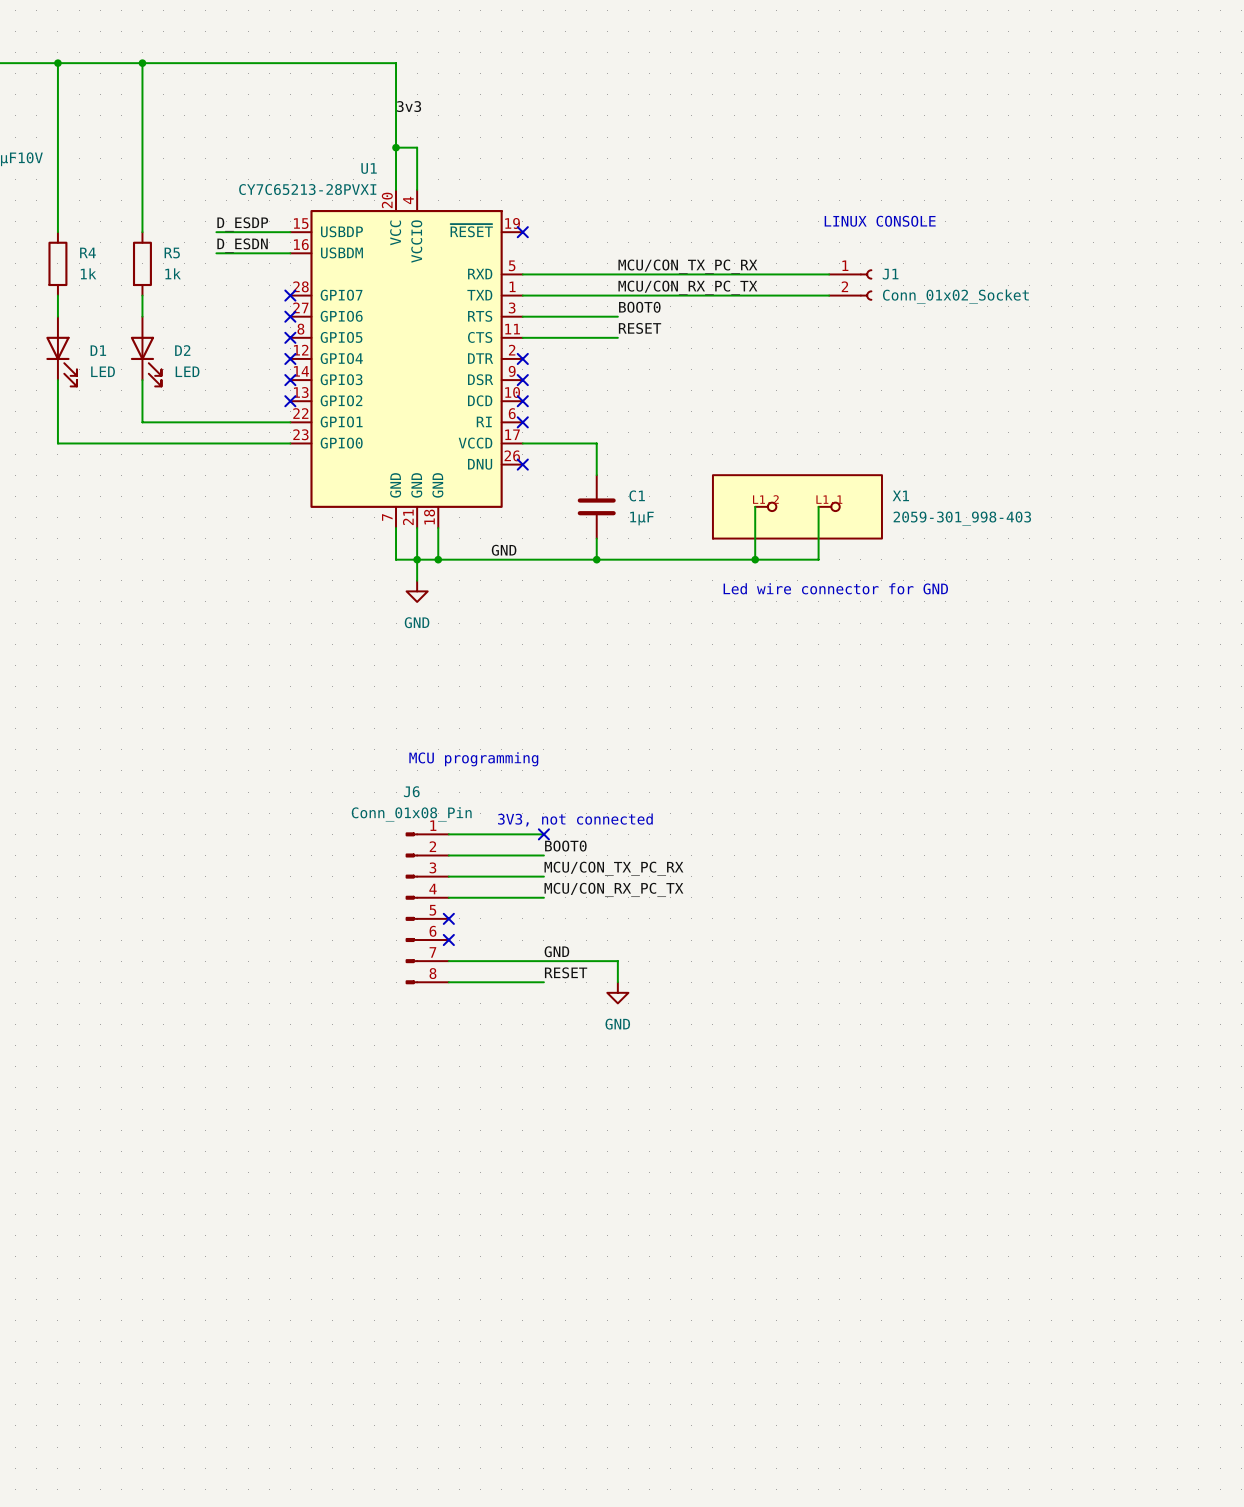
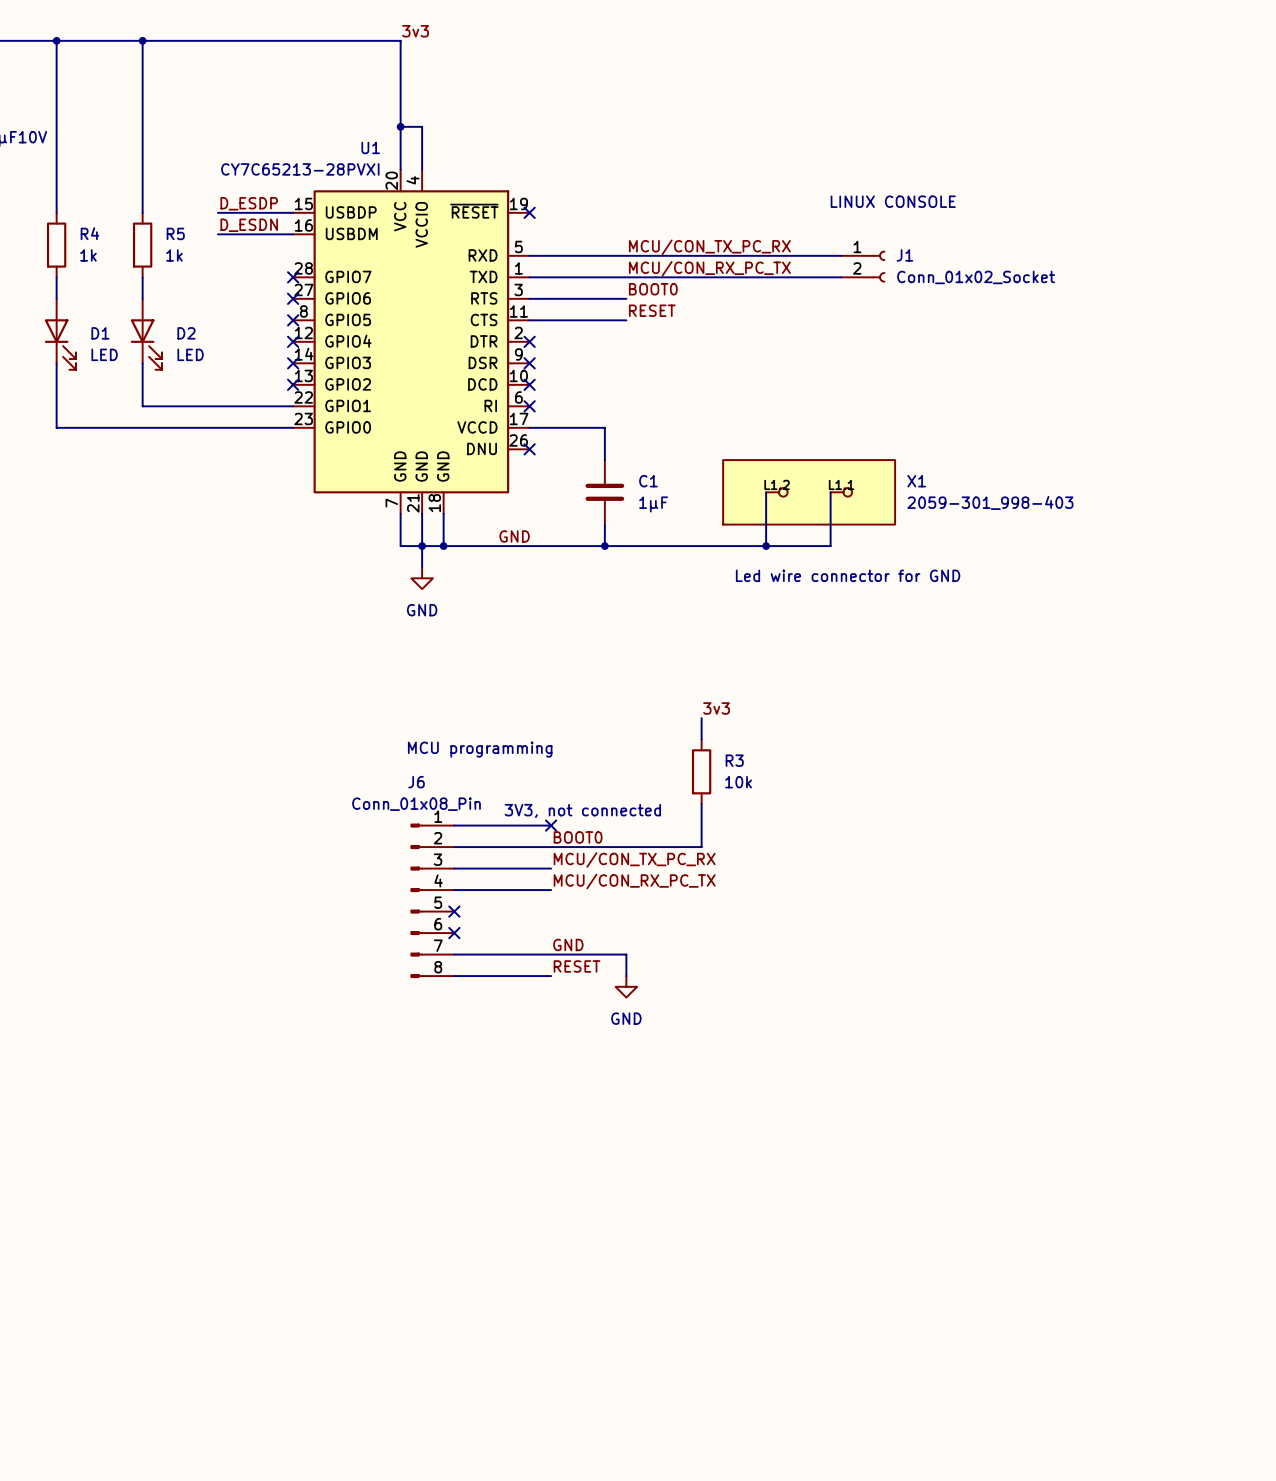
label position: 3v3 (409, 106) -> 3v3 (415, 31)
label: none -> 3v3 (716, 708)
wire: none -> (701, 718) (701, 739)
R3: none -> 10k (701, 771)
wire: none -> (701, 804) (701, 847) (551, 847)

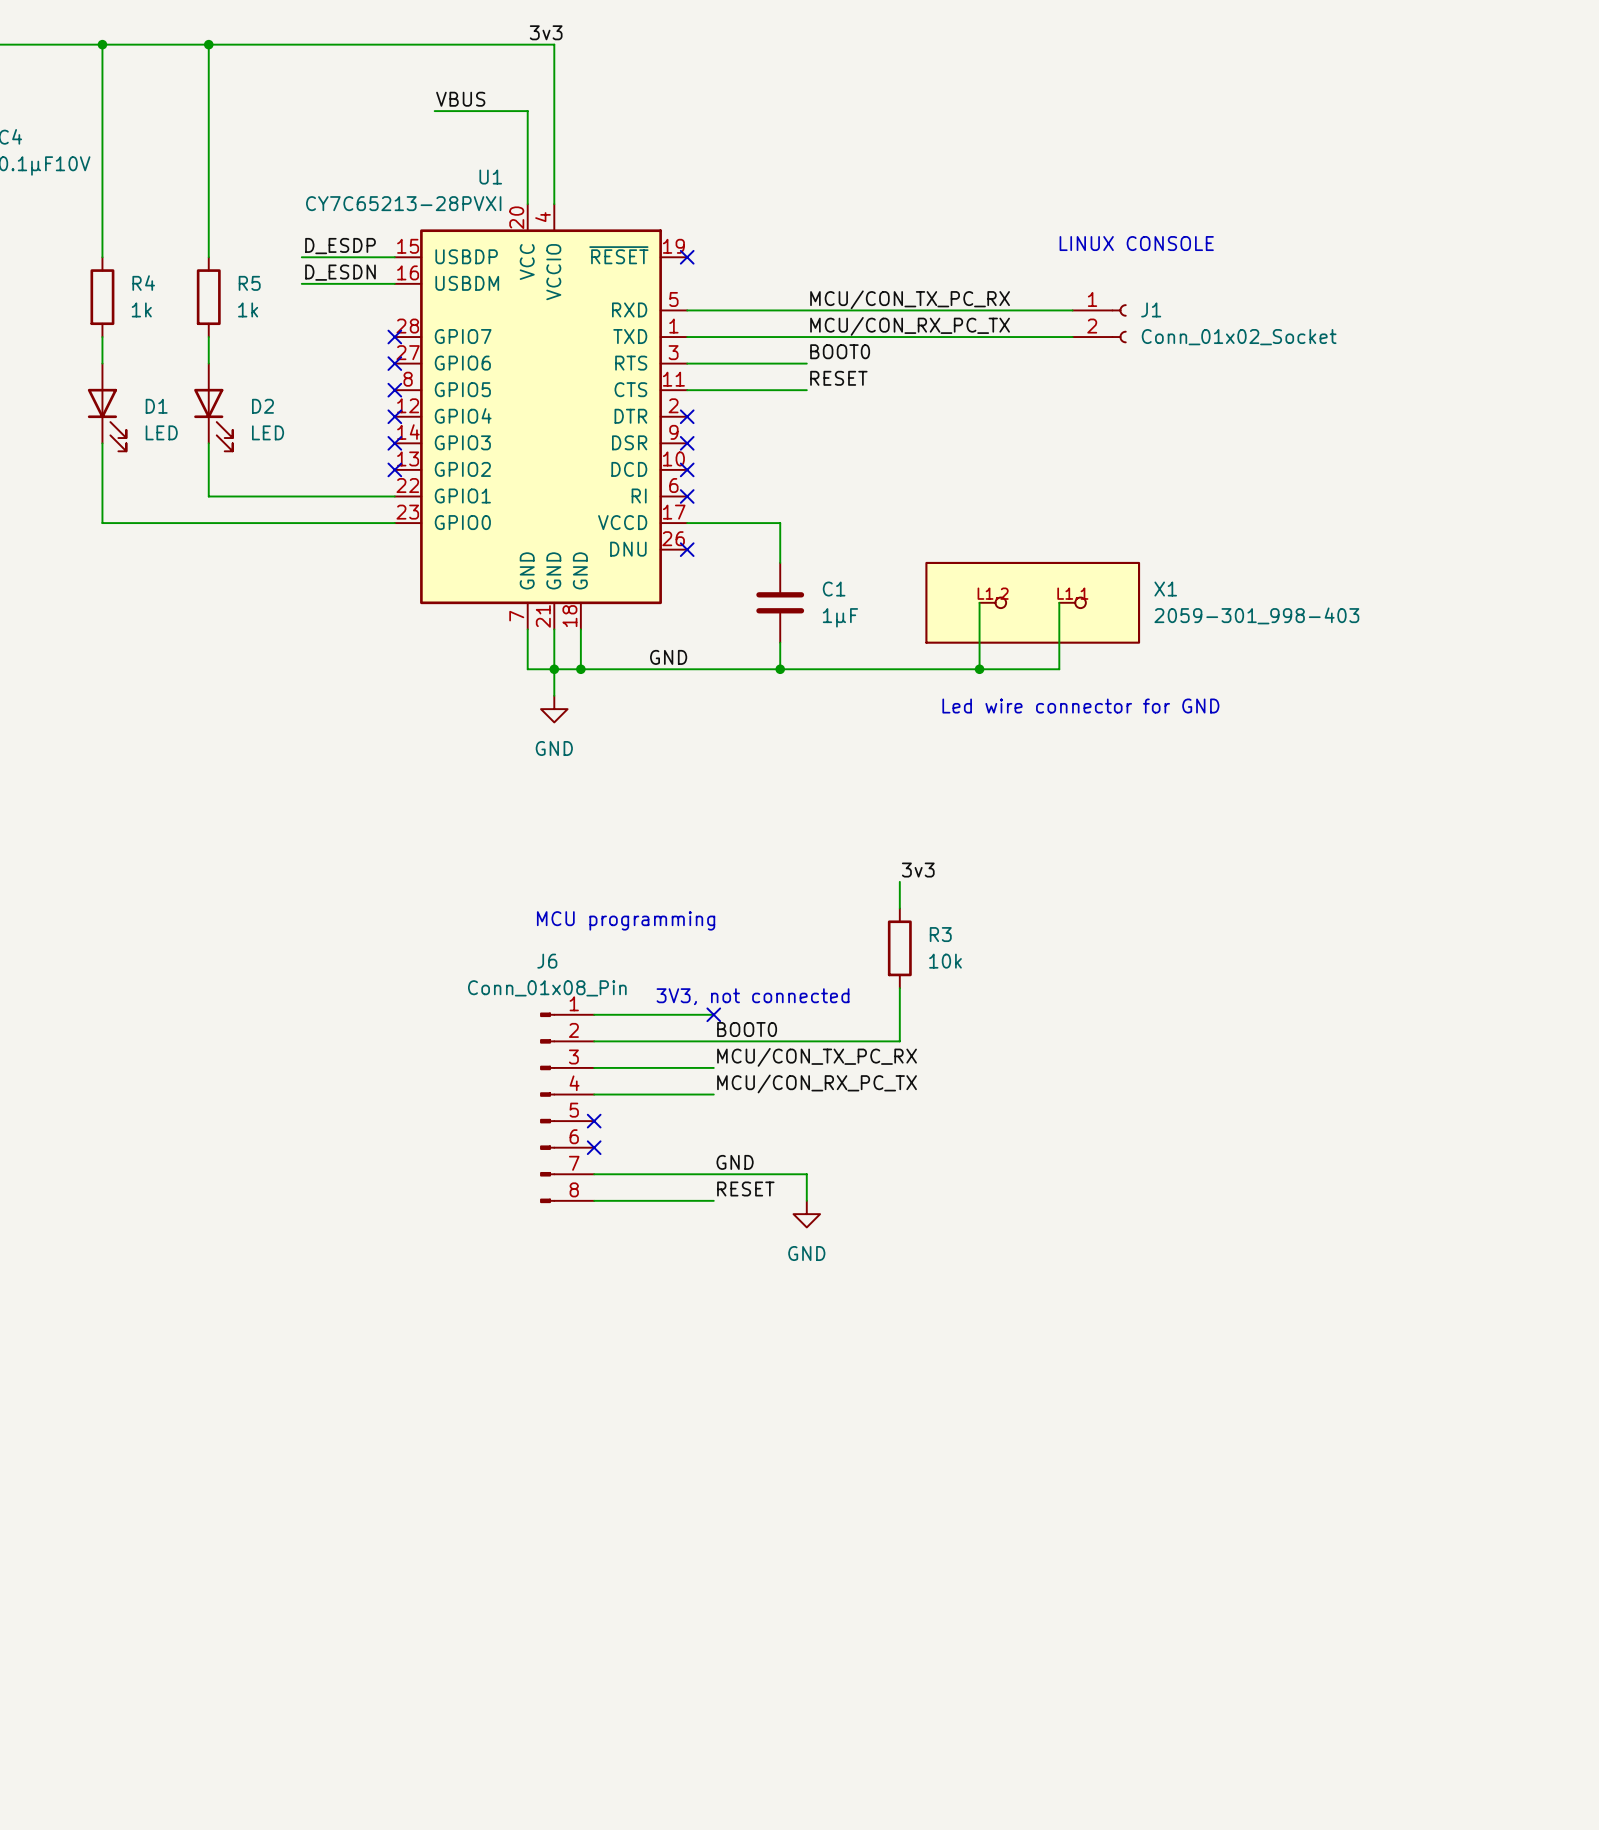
wire: (400, 40) (400, 94) -> (527, 44) (554, 44) (554, 150)
label: none -> VBUS (460, 99)
wire: none -> (434, 111) (527, 111)
wire: (400, 126) (422, 126) -> none
junction: (400, 126) -> none

